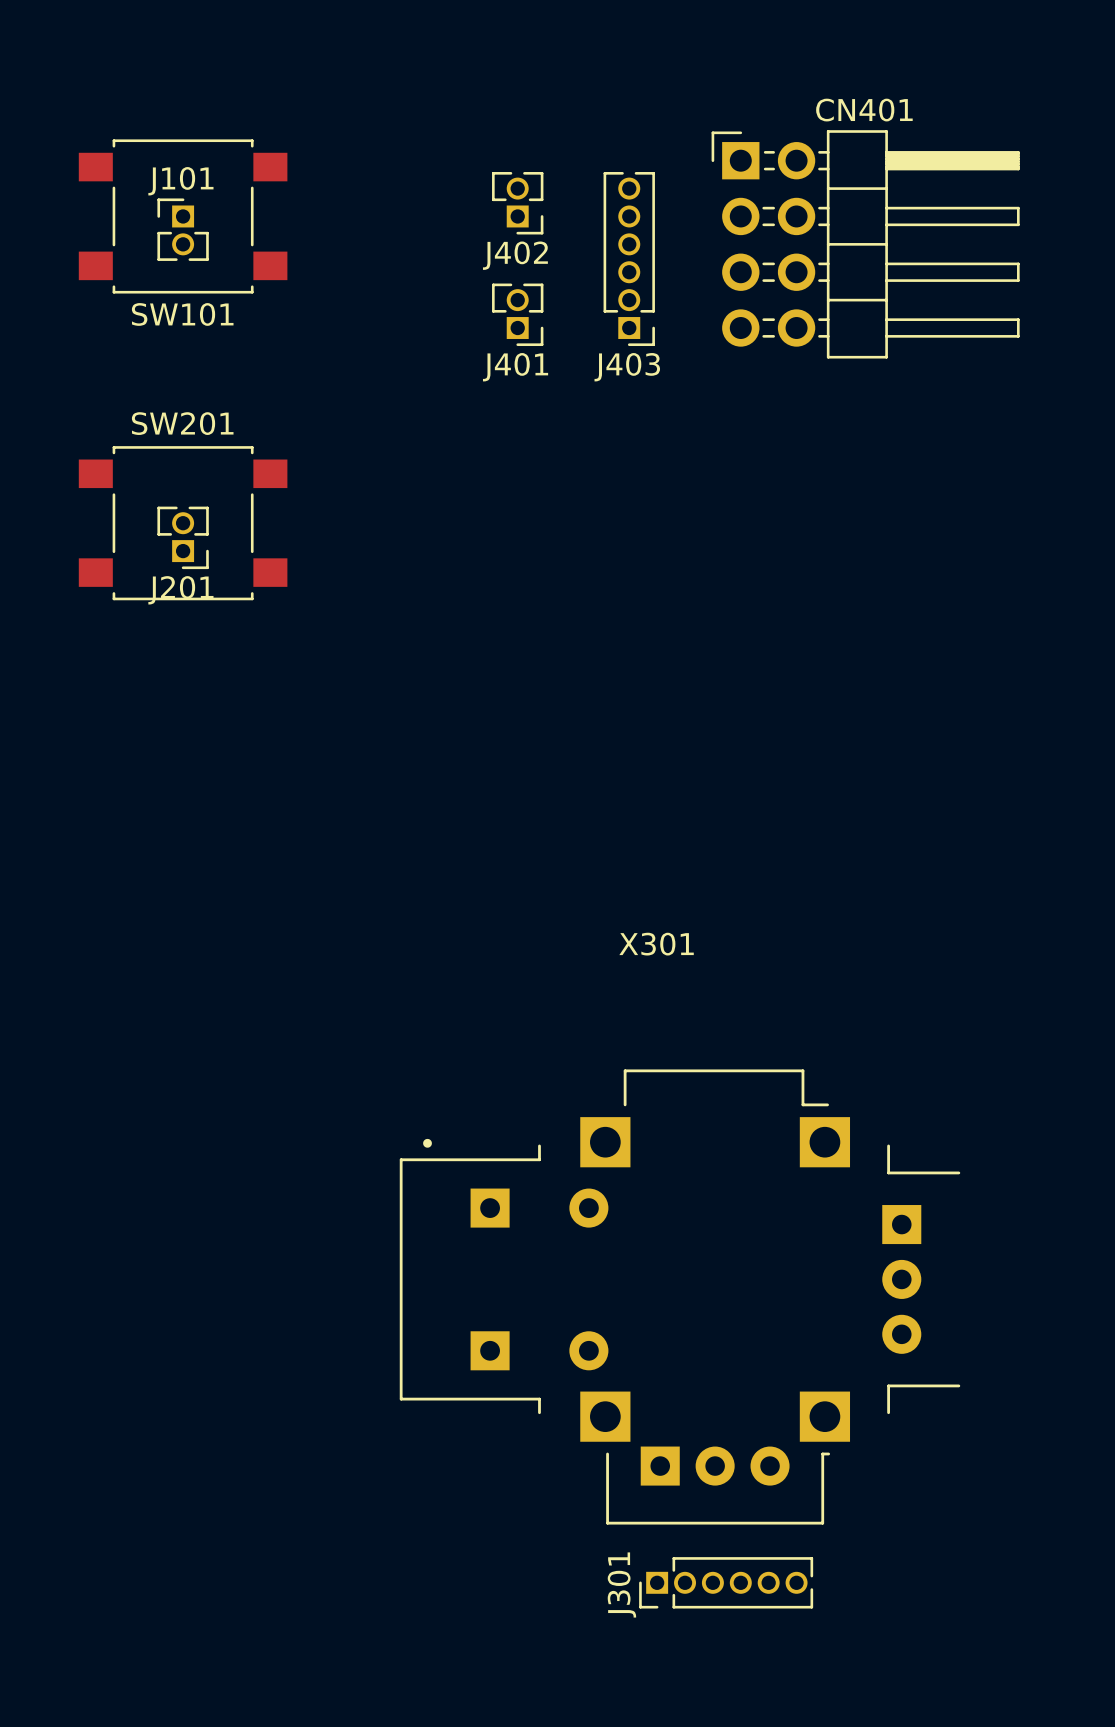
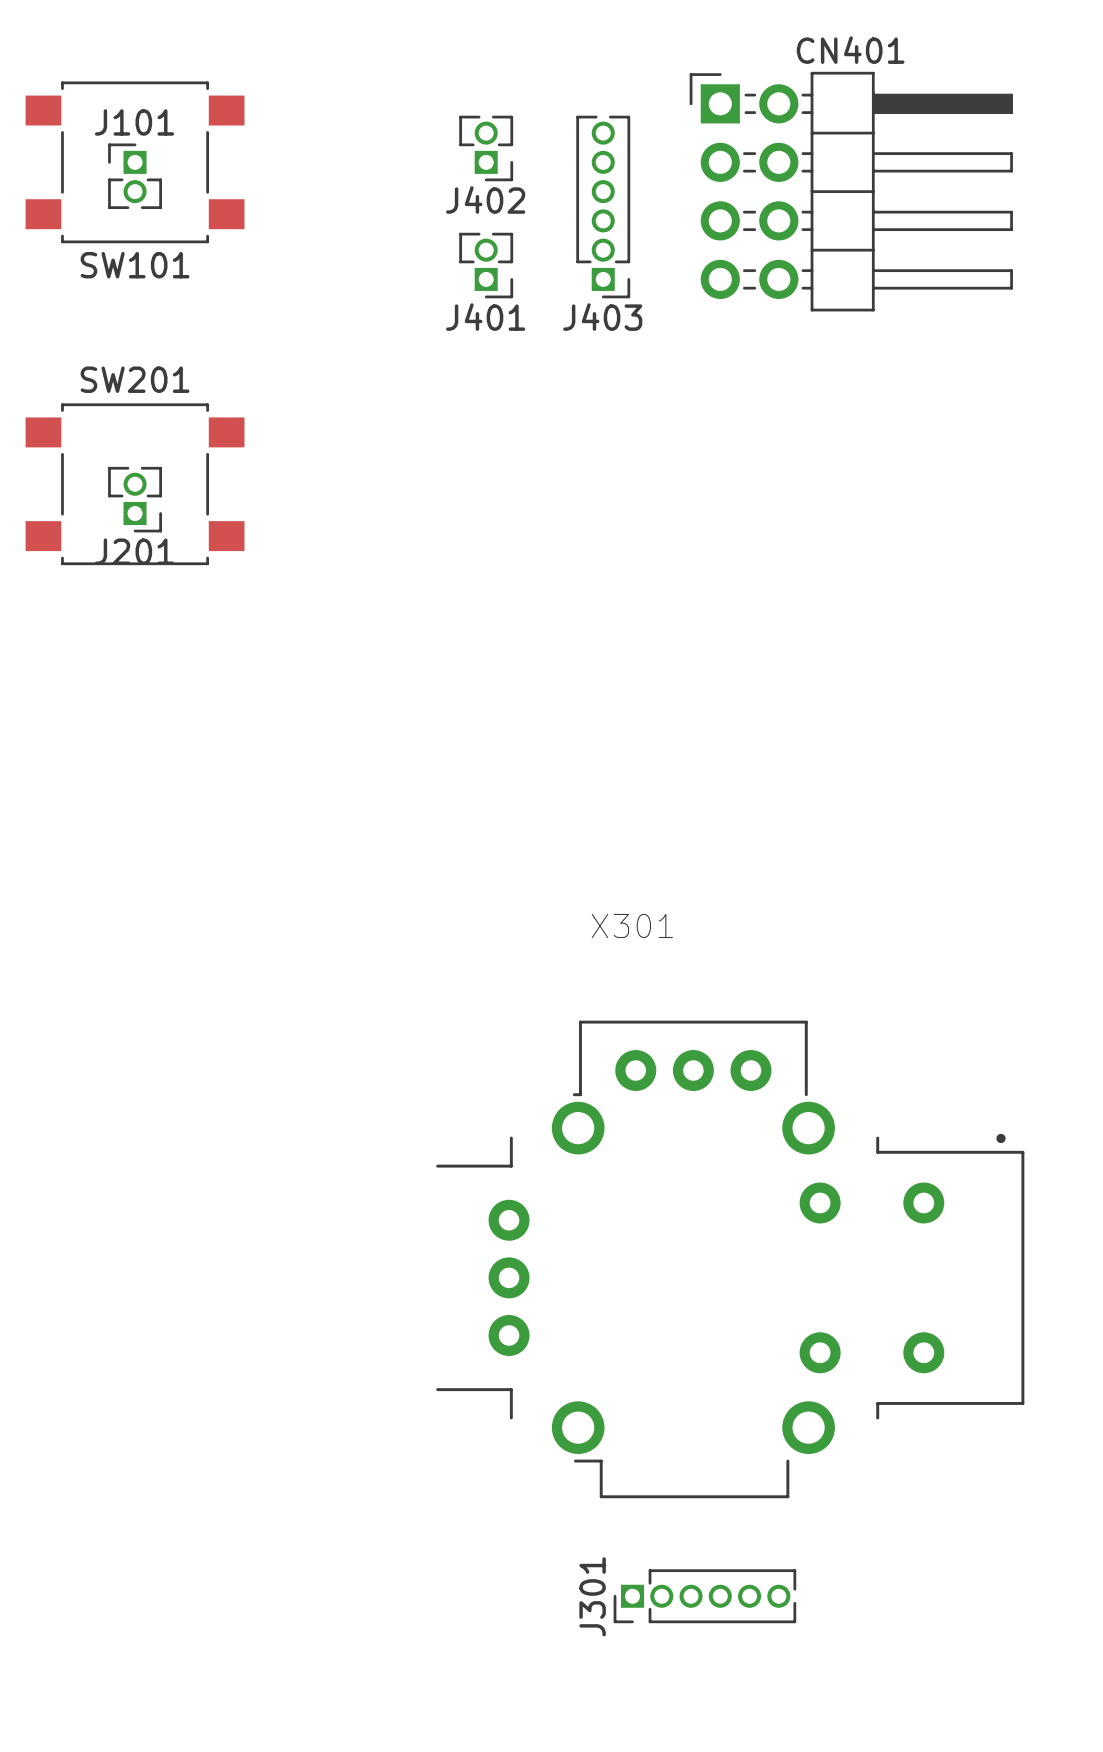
X301 footprint: [399, 1069, 961, 1525] -> [436, 1020, 1025, 1499]

